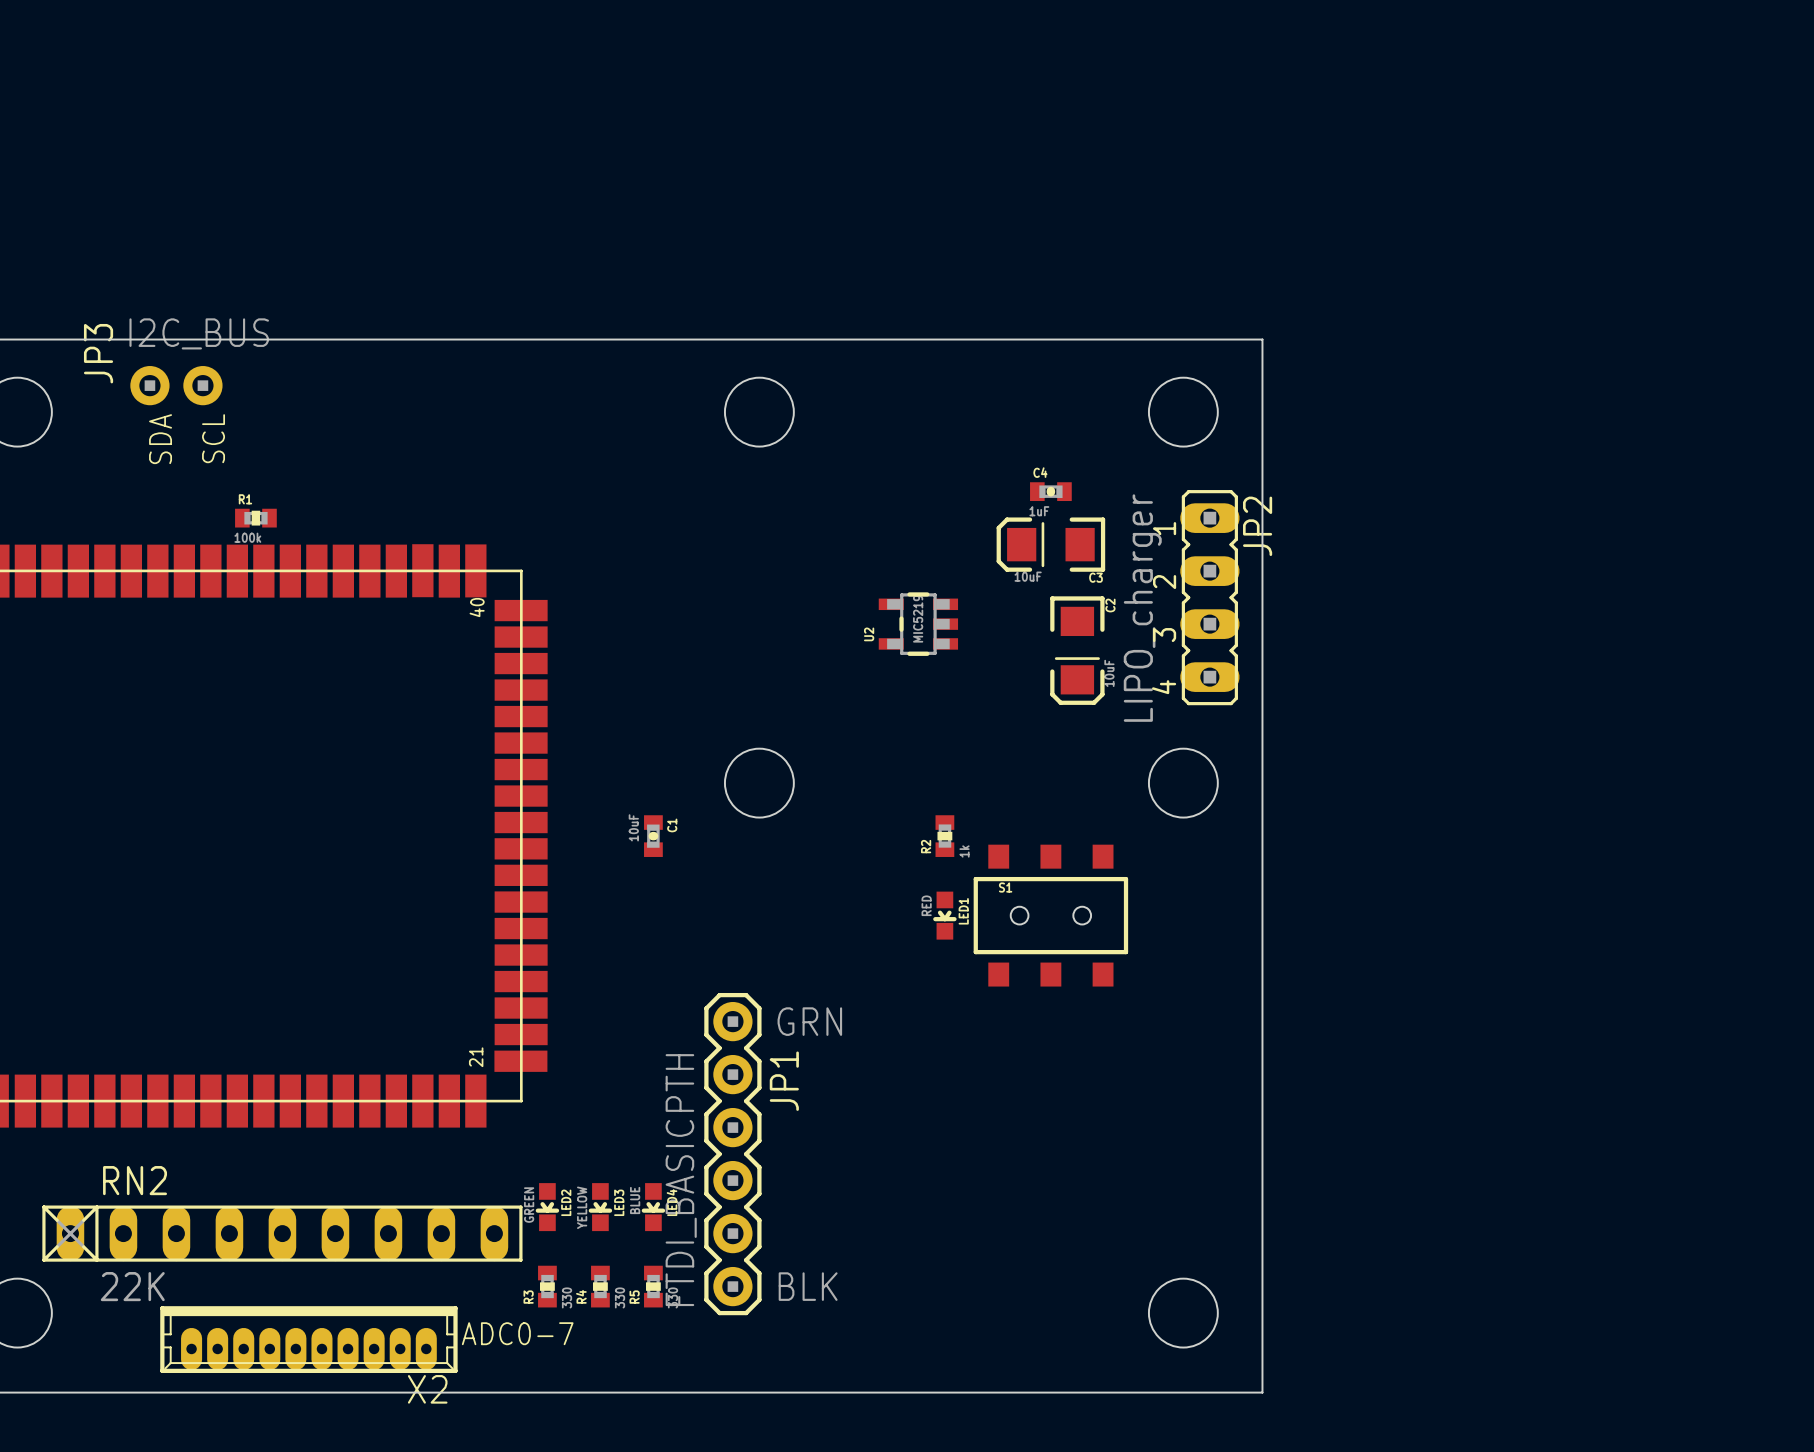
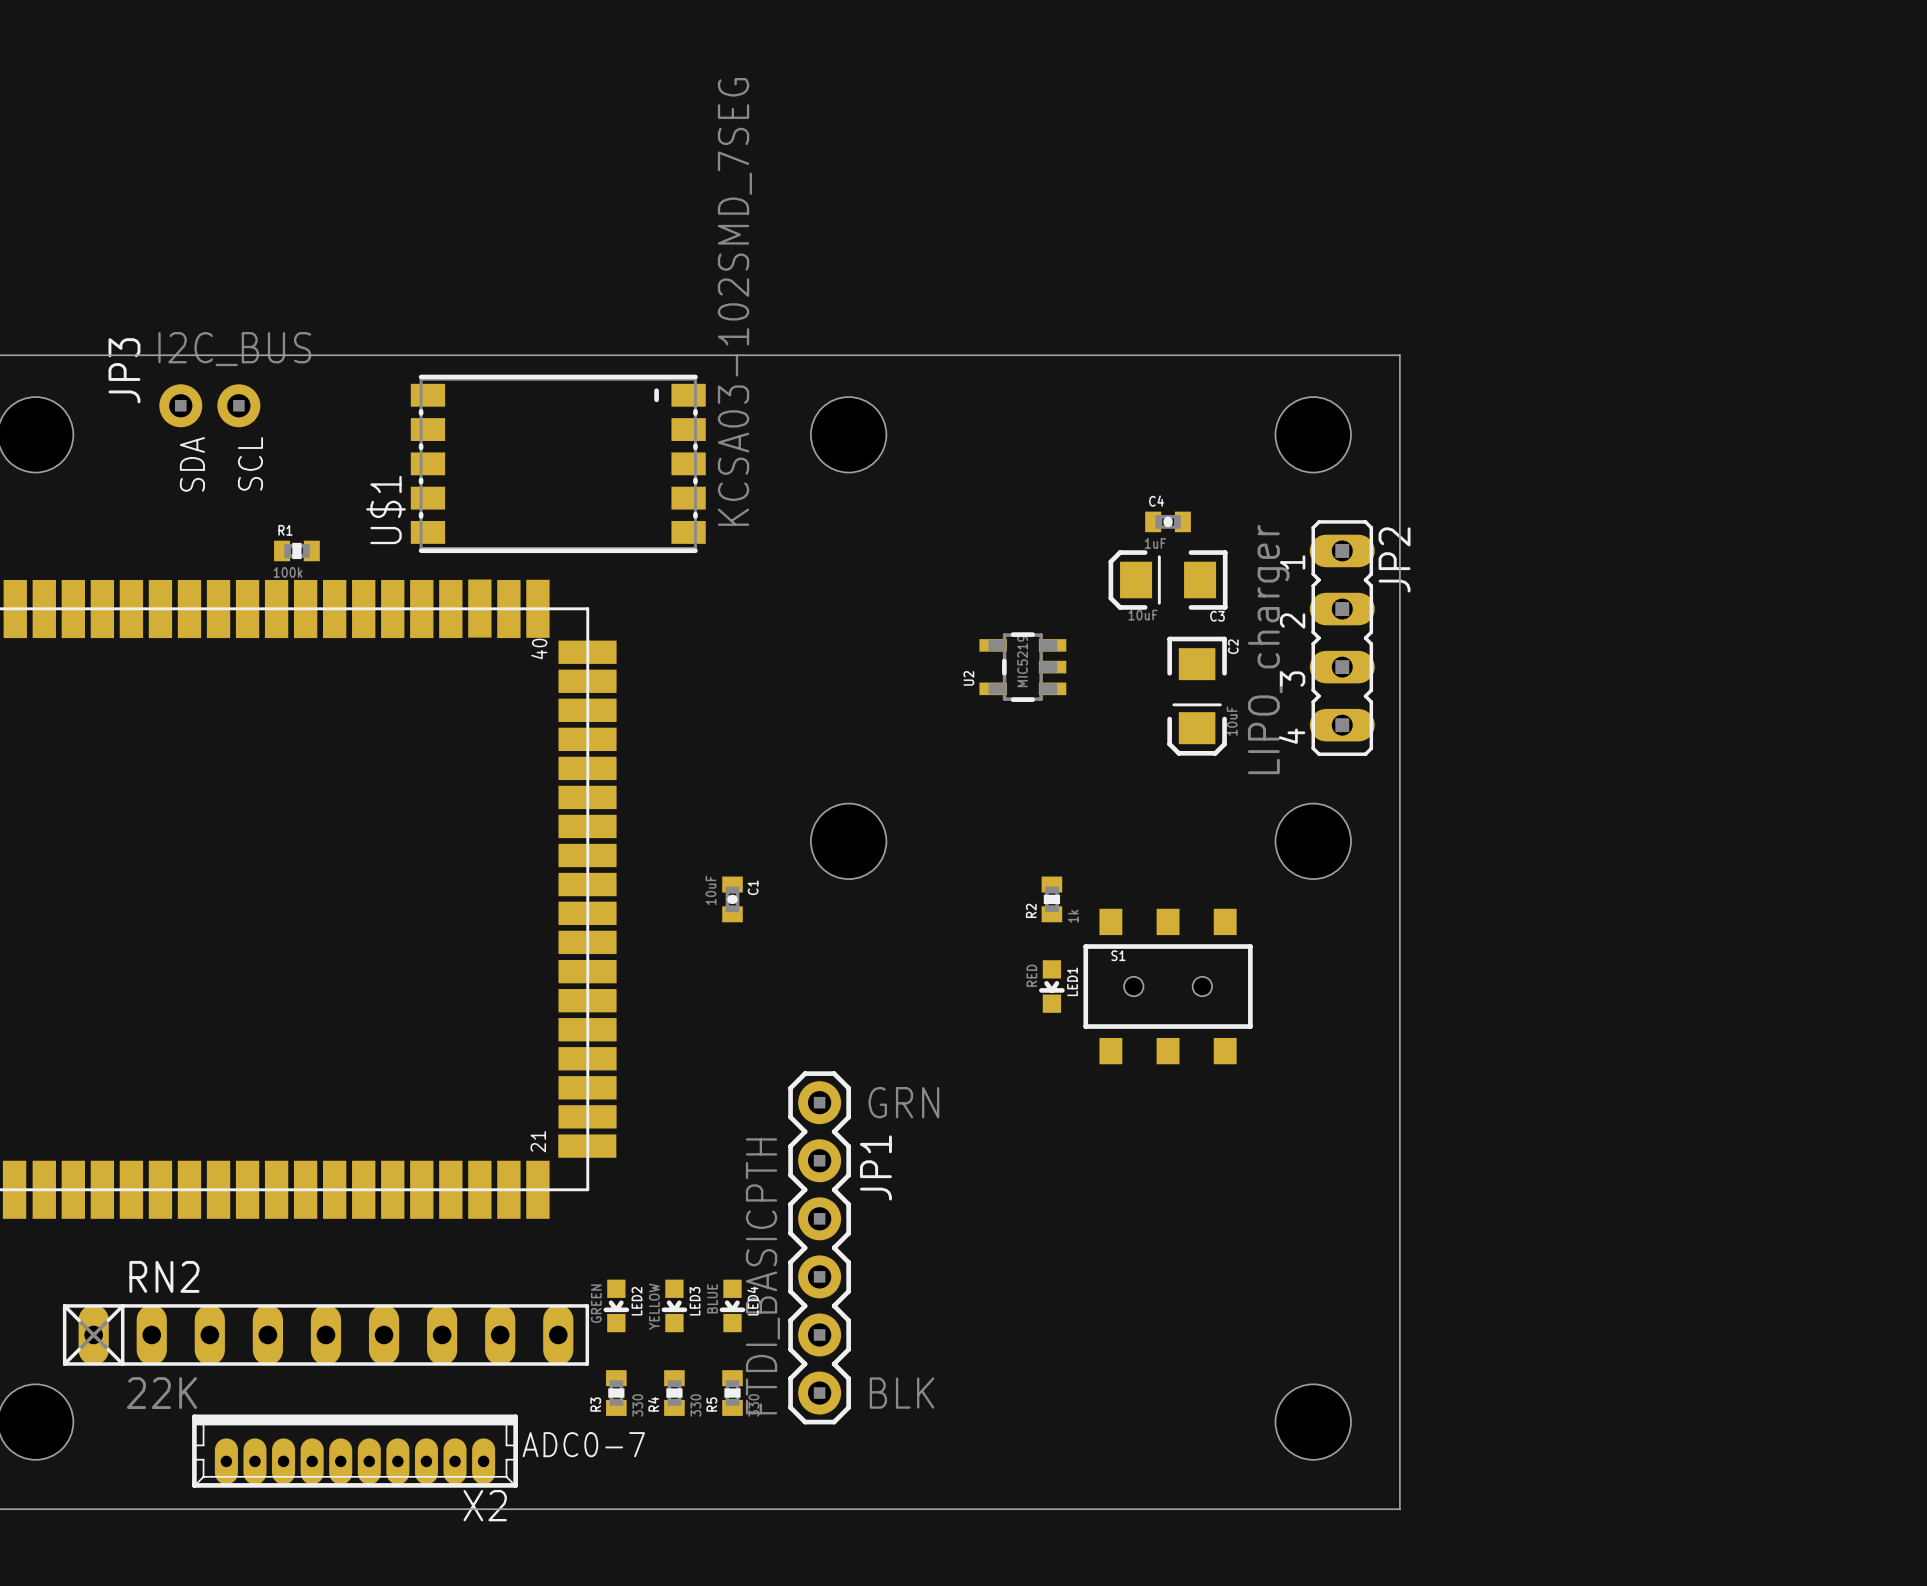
U$1: none -> KCSA03-102SMD_7SEG (558, 463)

